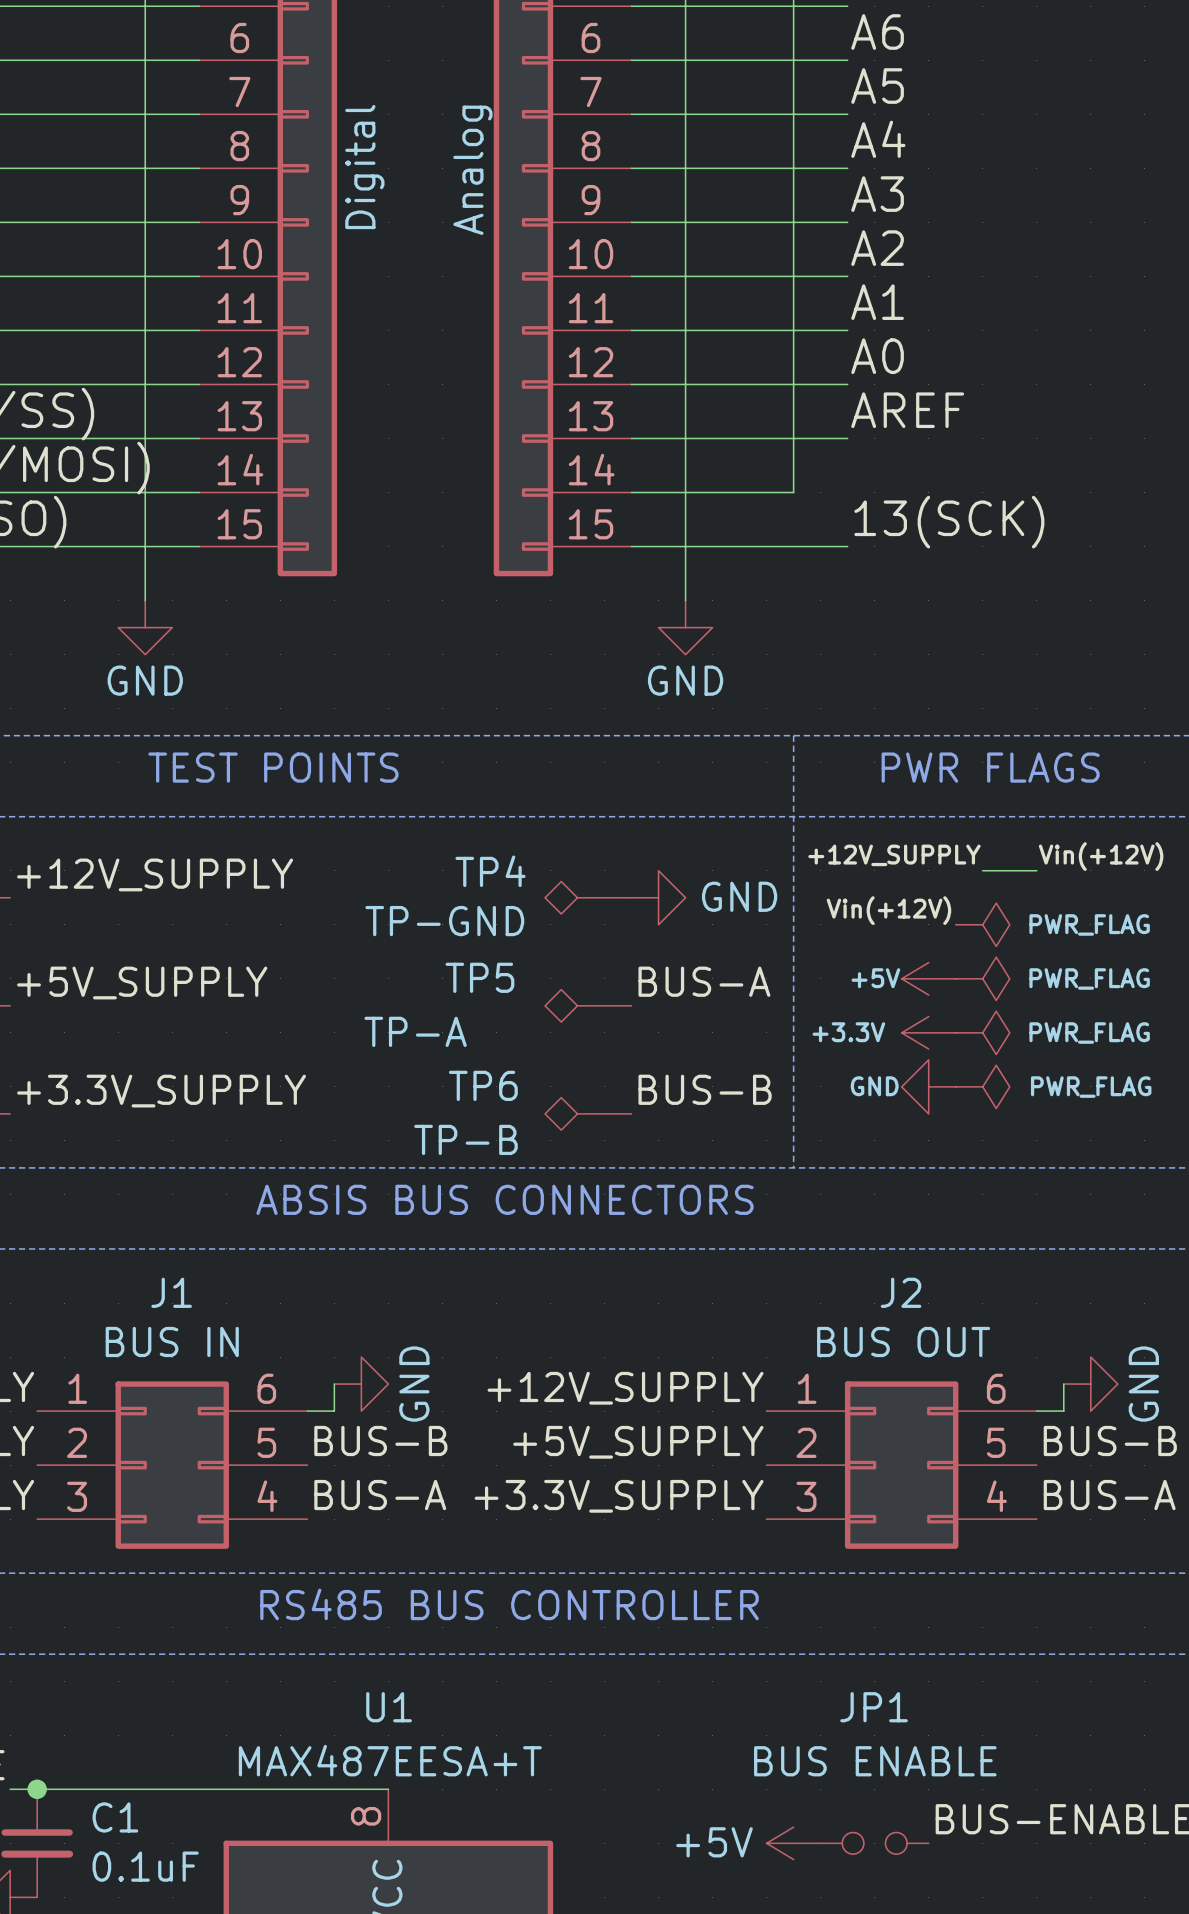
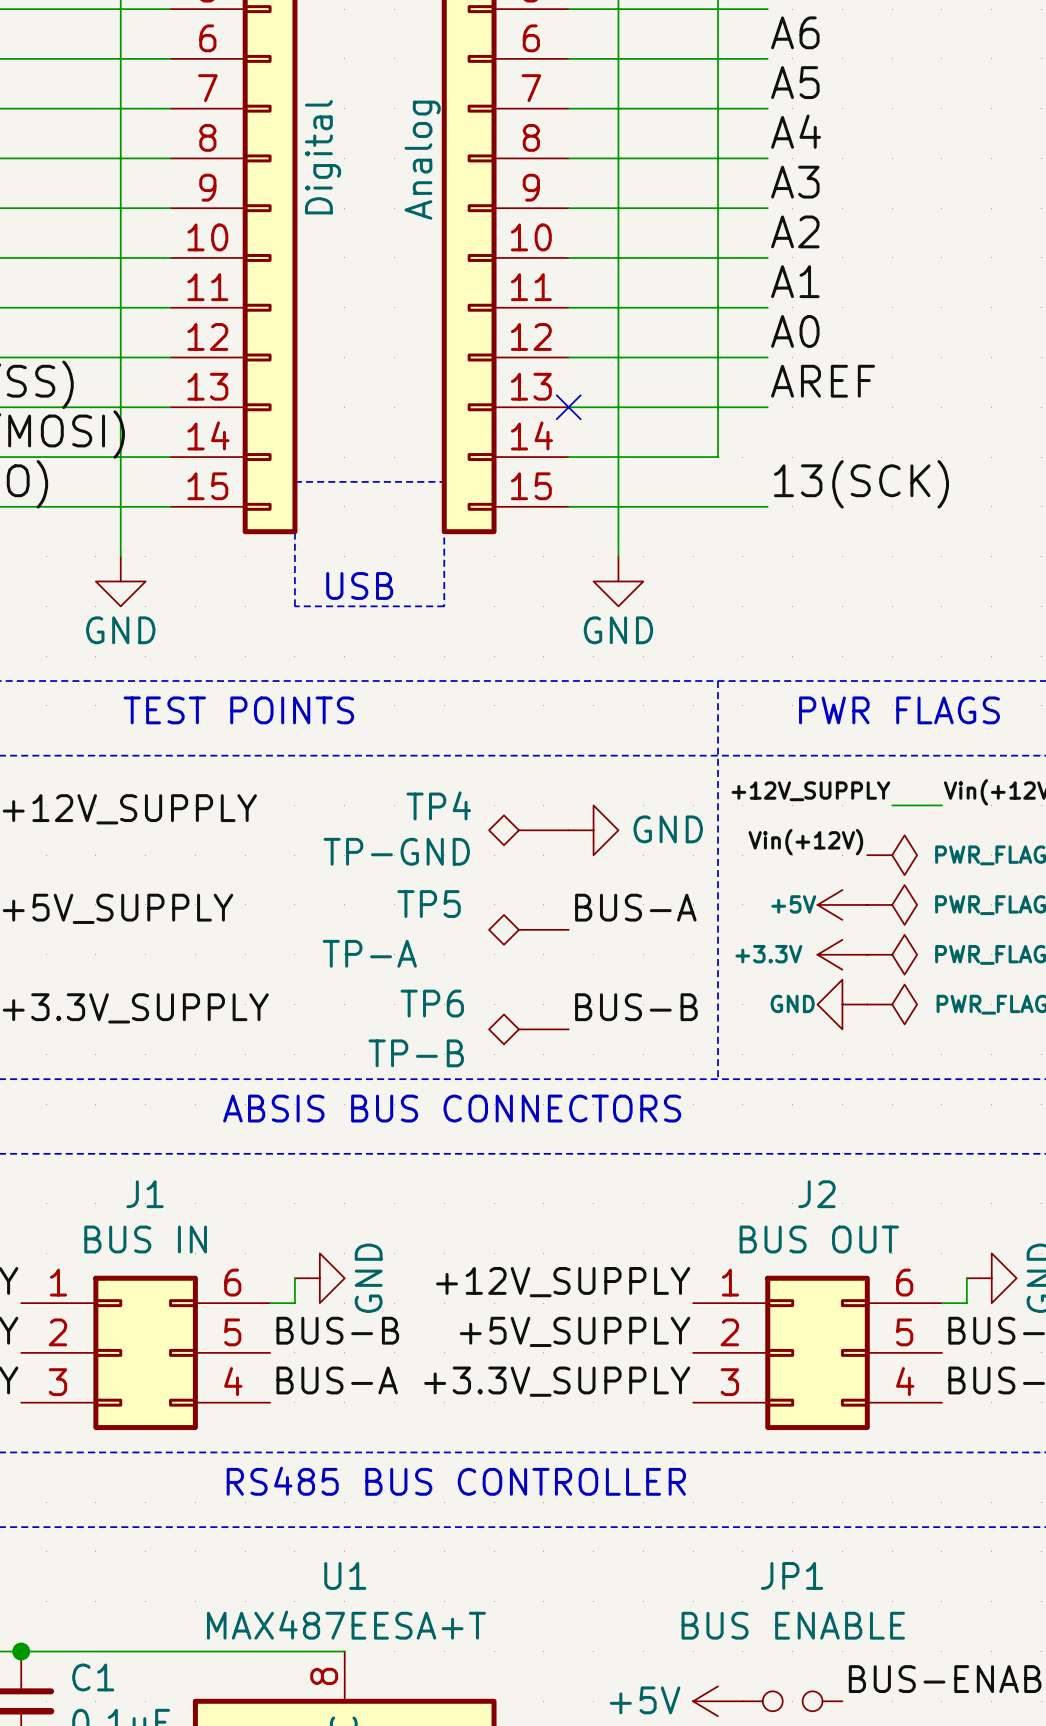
no-connect mark: none -> (568, 407)
line: none -> (294, 481) (444, 481) (444, 606) (294, 606) (294, 481)
text: none -> USB (359, 585)

